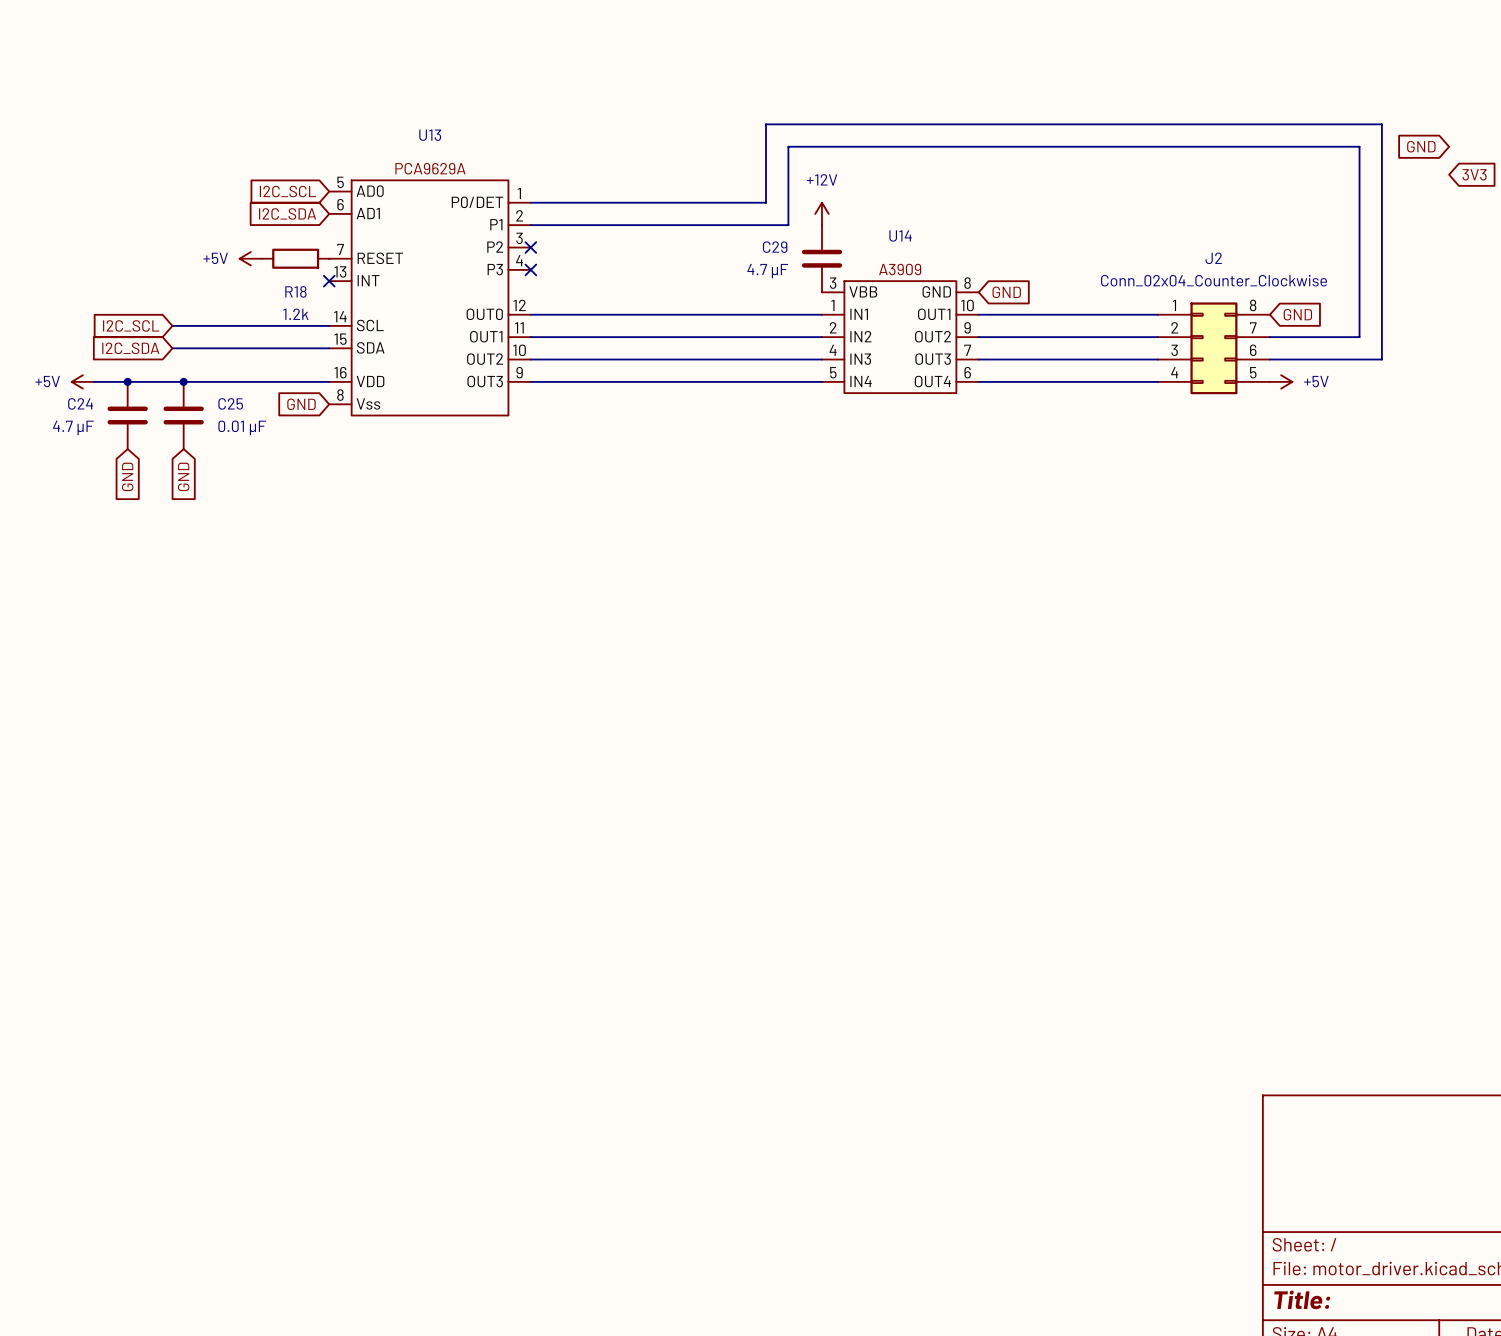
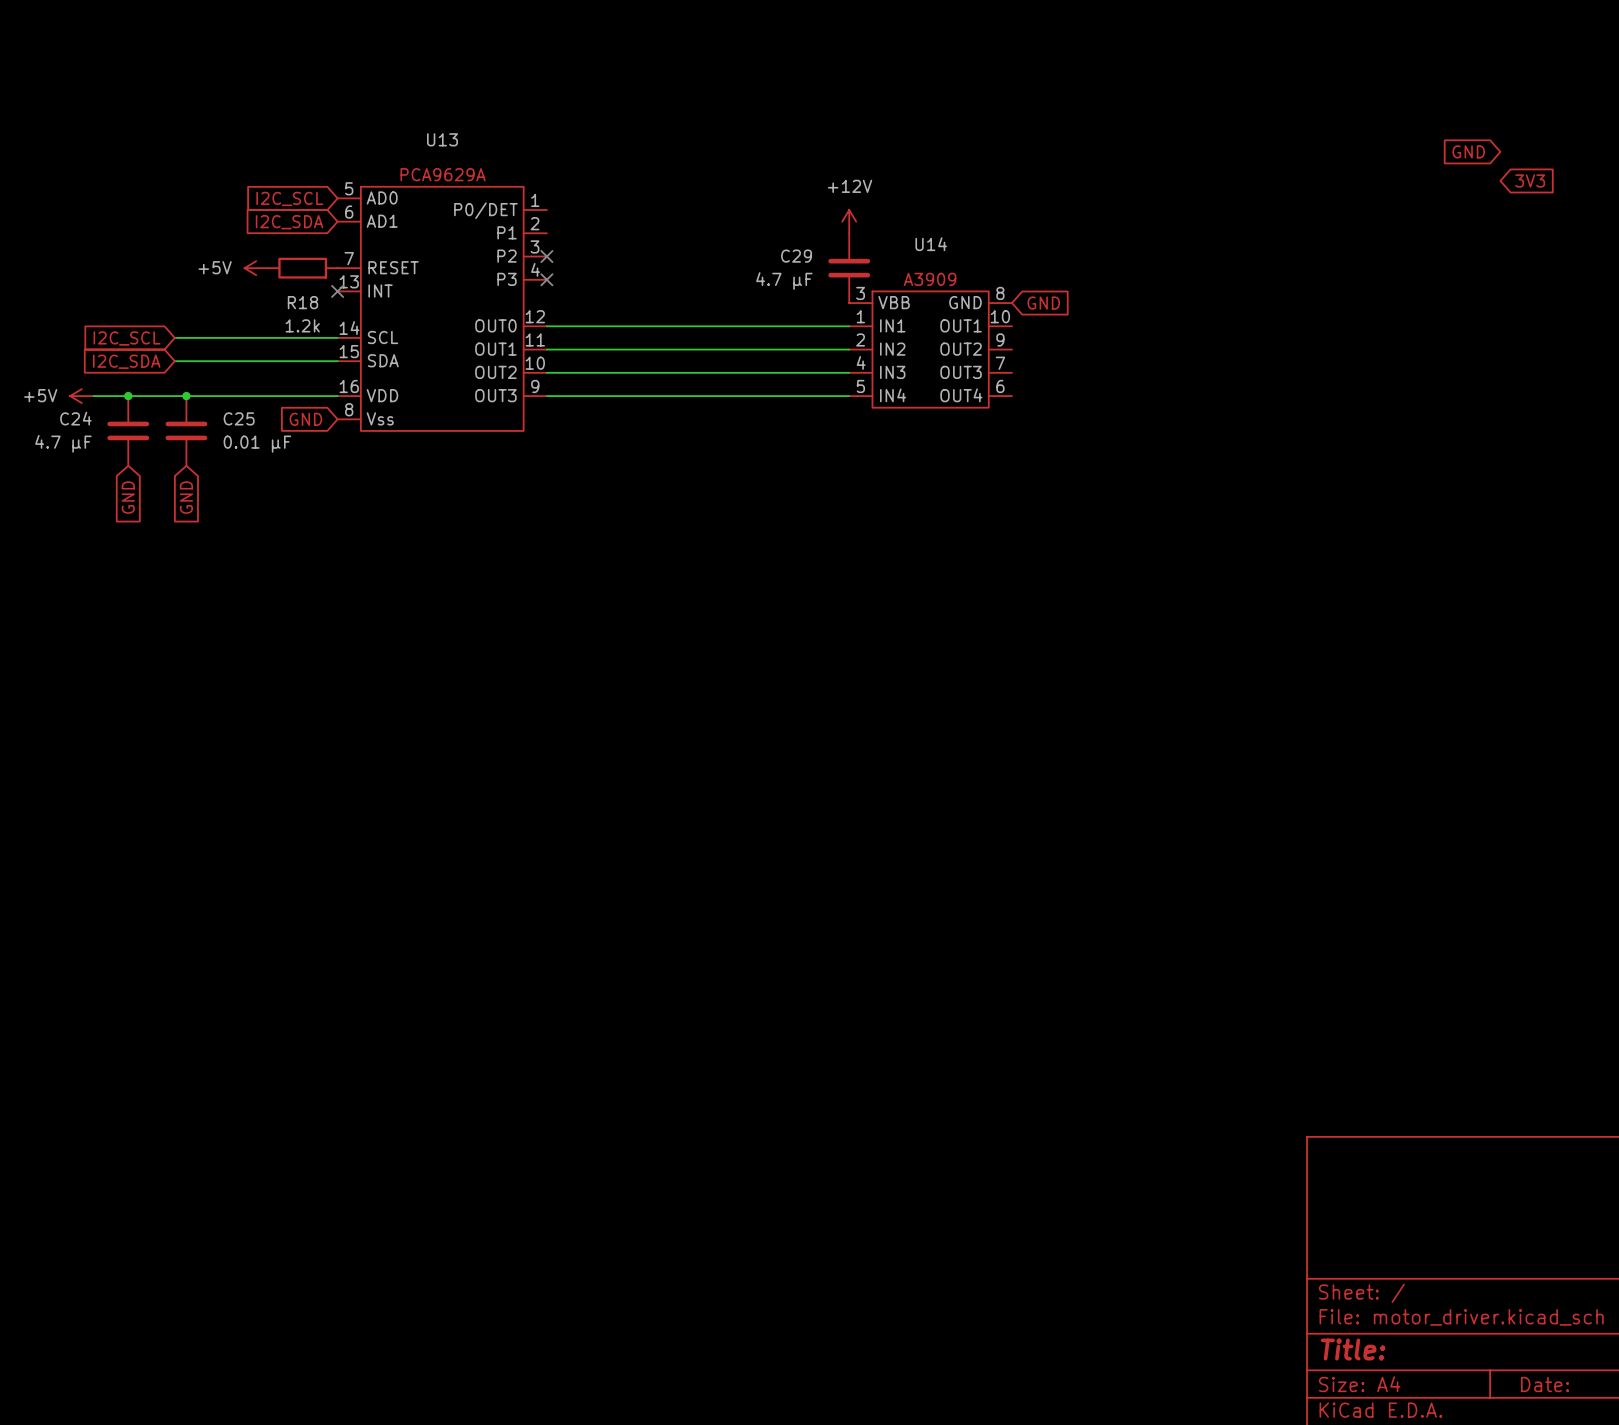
wire: (530, 202) (766, 202) (766, 124) (1381, 124) (1381, 359) (1269, 359) -> none
wire: (530, 225) (788, 225) (788, 146) (1359, 146) (1359, 337) (1269, 337) -> none
wire: (978, 314) (1157, 314) -> none
global label: GND (1297, 314) -> none
wire: (978, 337) (1157, 337) -> none
J2: Conn_02x04_Counter_Clockwise (1213, 348) -> none
wire: (978, 359) (1157, 359) -> none
wire: (978, 381) (1157, 381) -> none
power symbol: +5V (1281, 381) -> none

